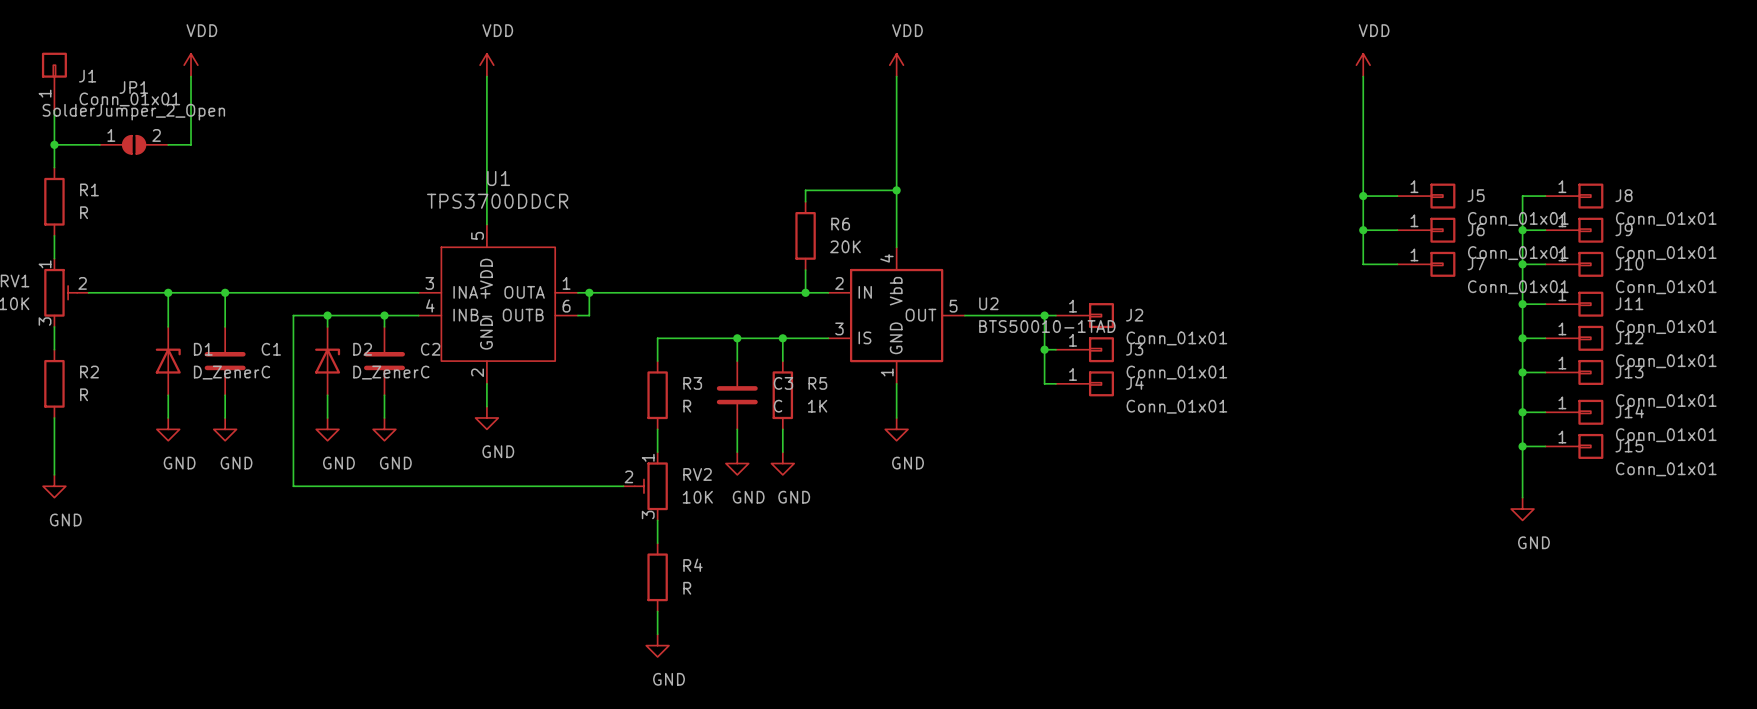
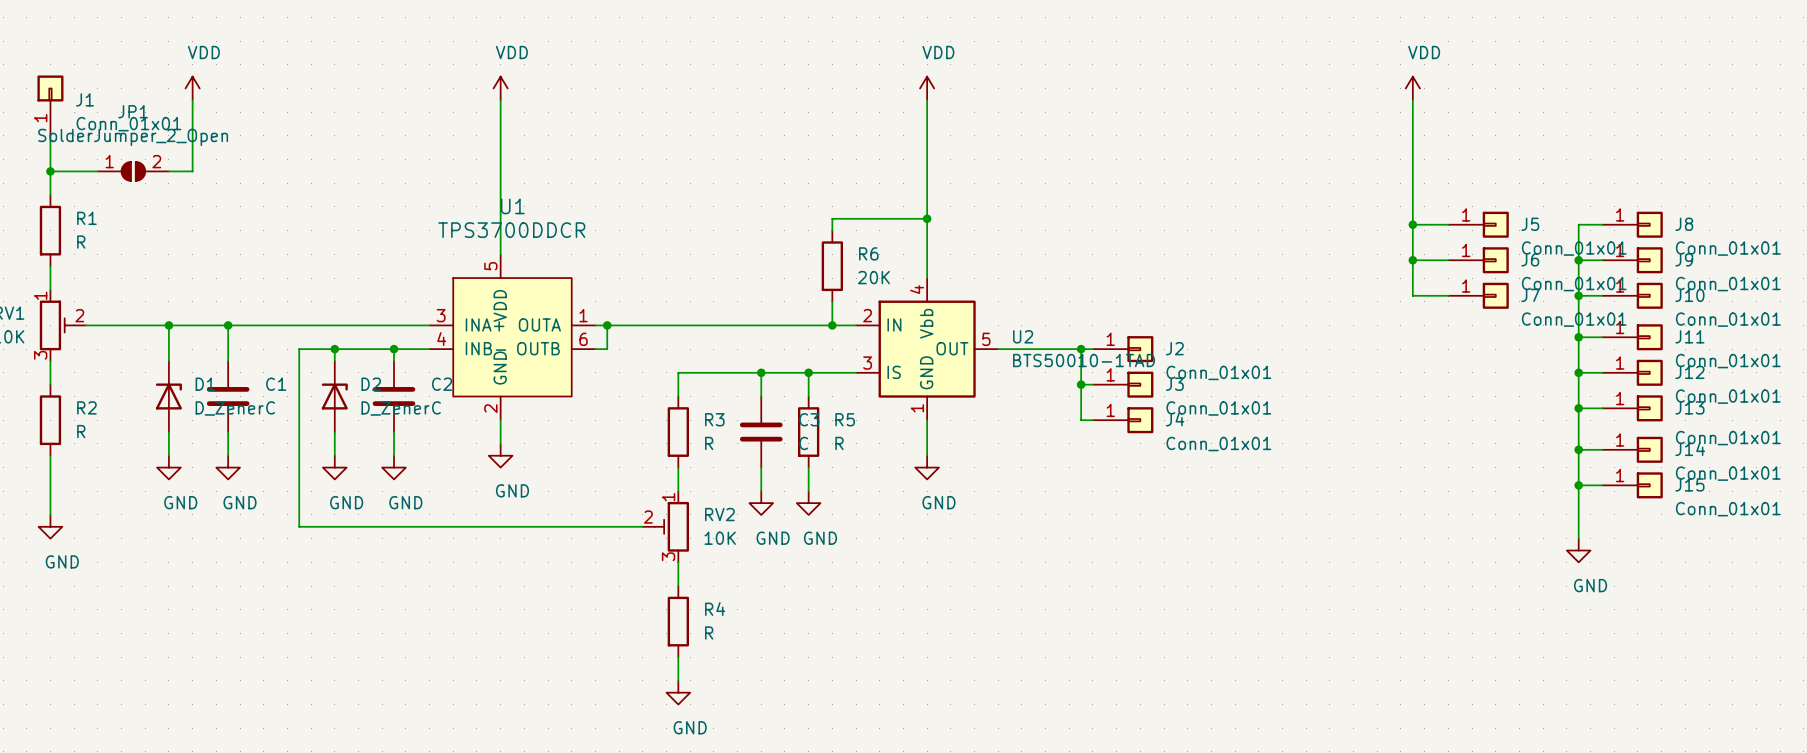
R5 value: 1K (817, 406) -> R (839, 443)

